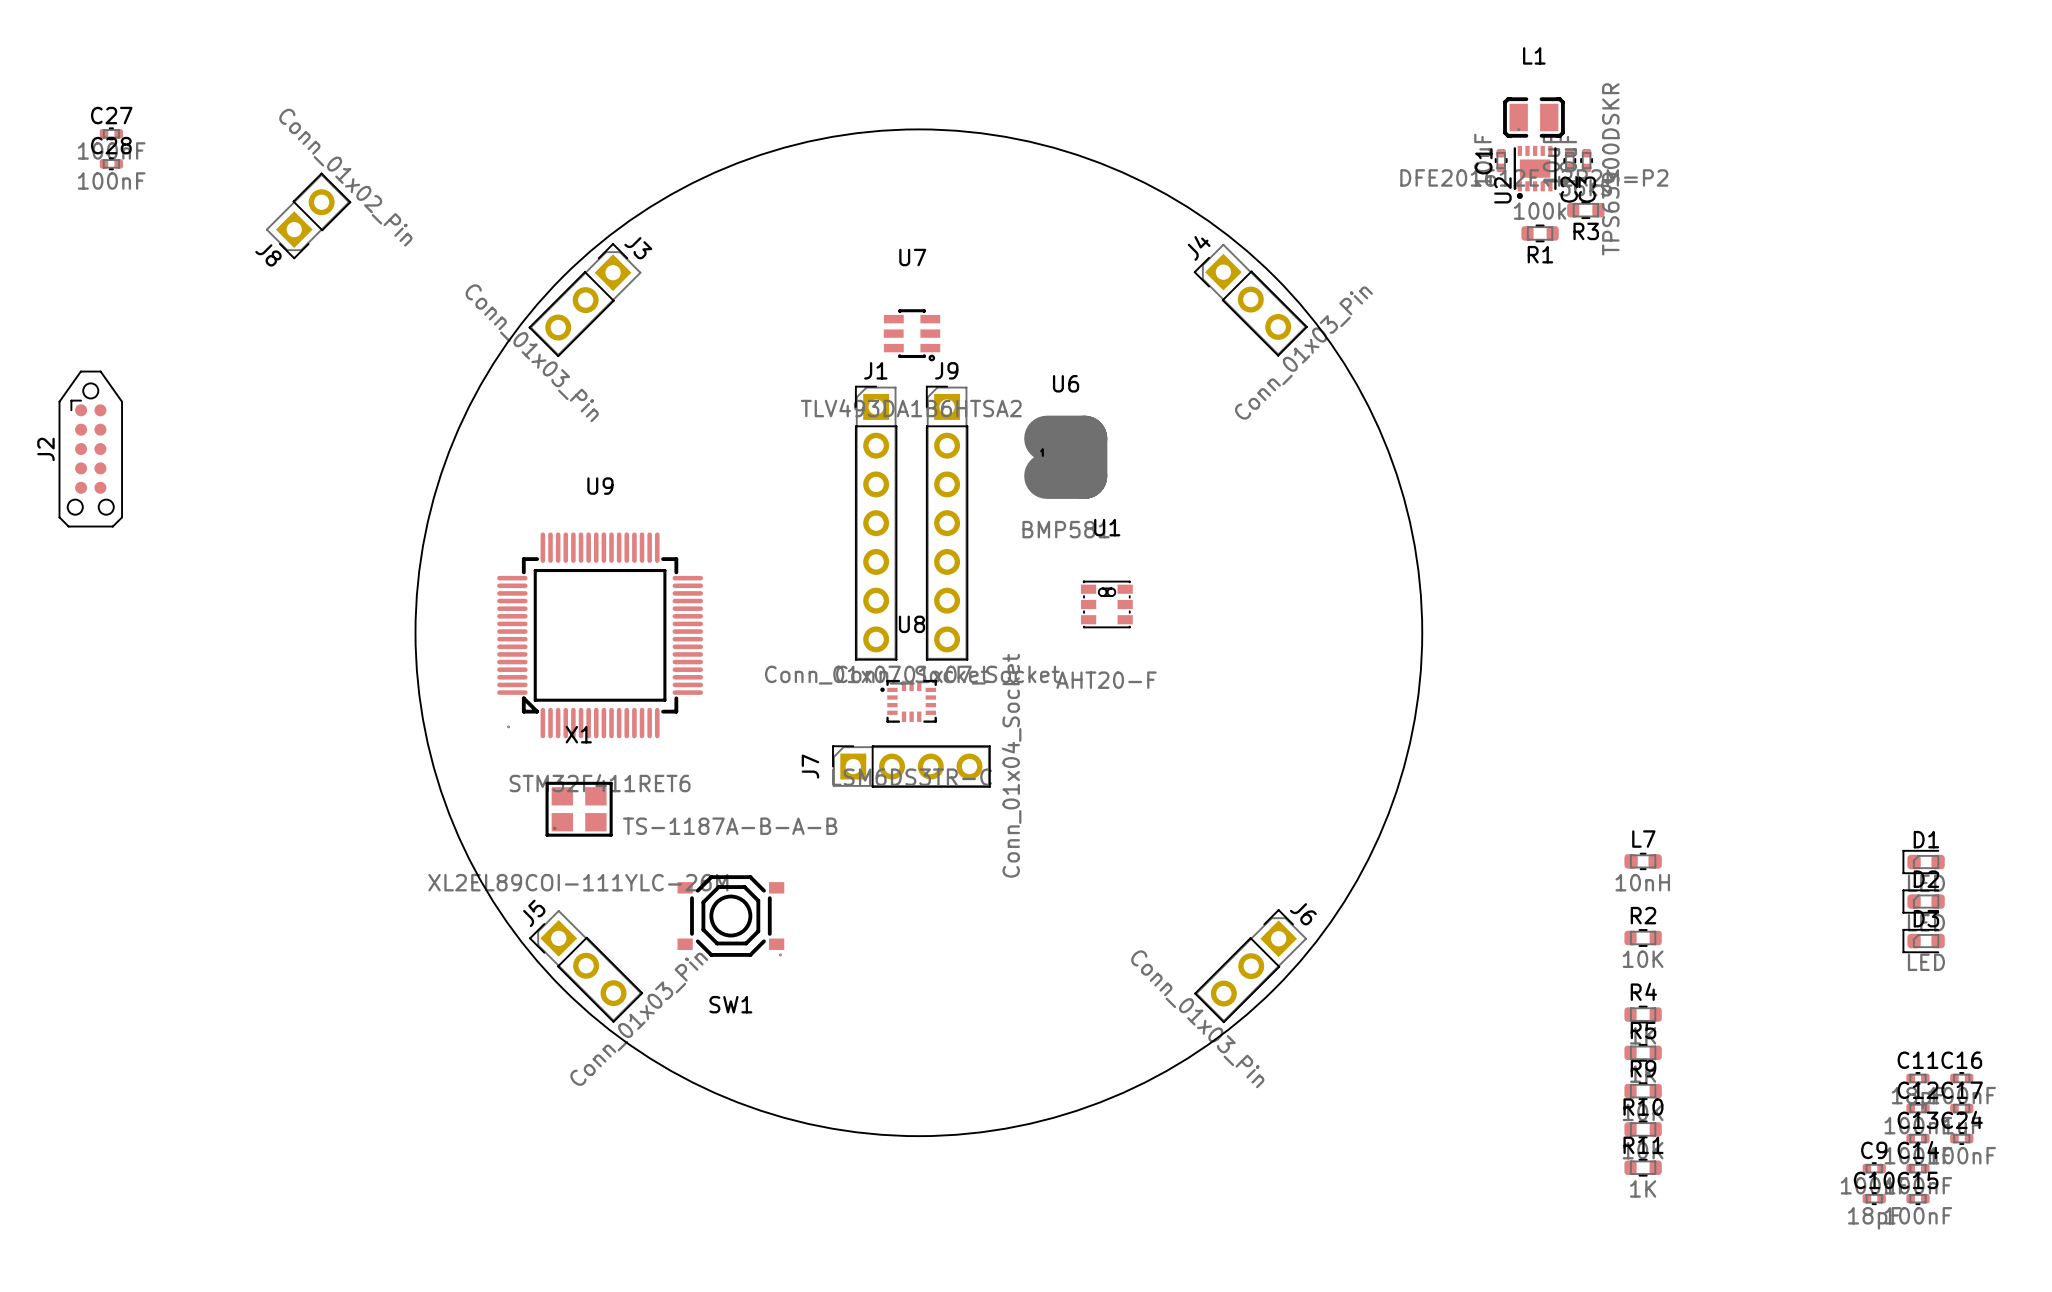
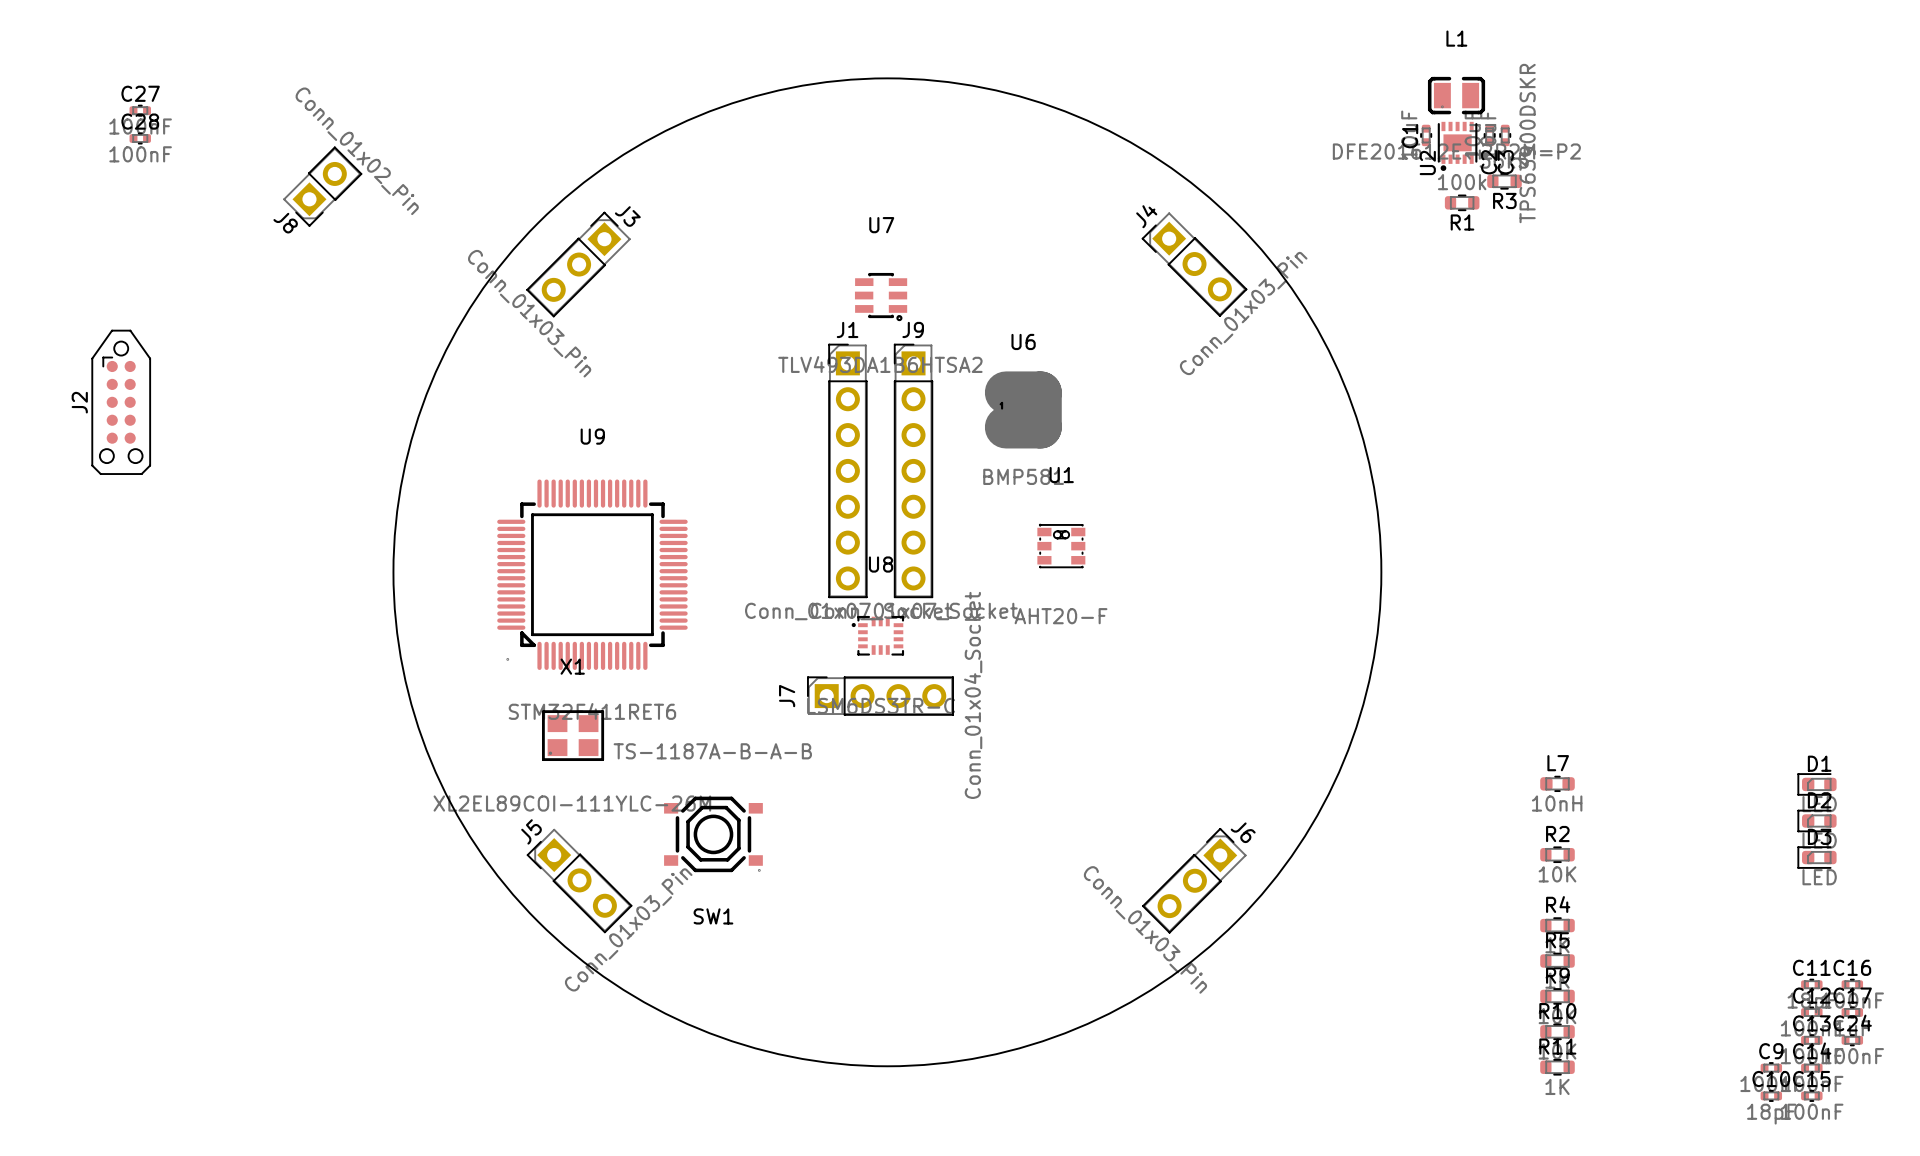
round board edge size: [415, 129, 1423, 1137] -> [393, 78, 1382, 1067]

